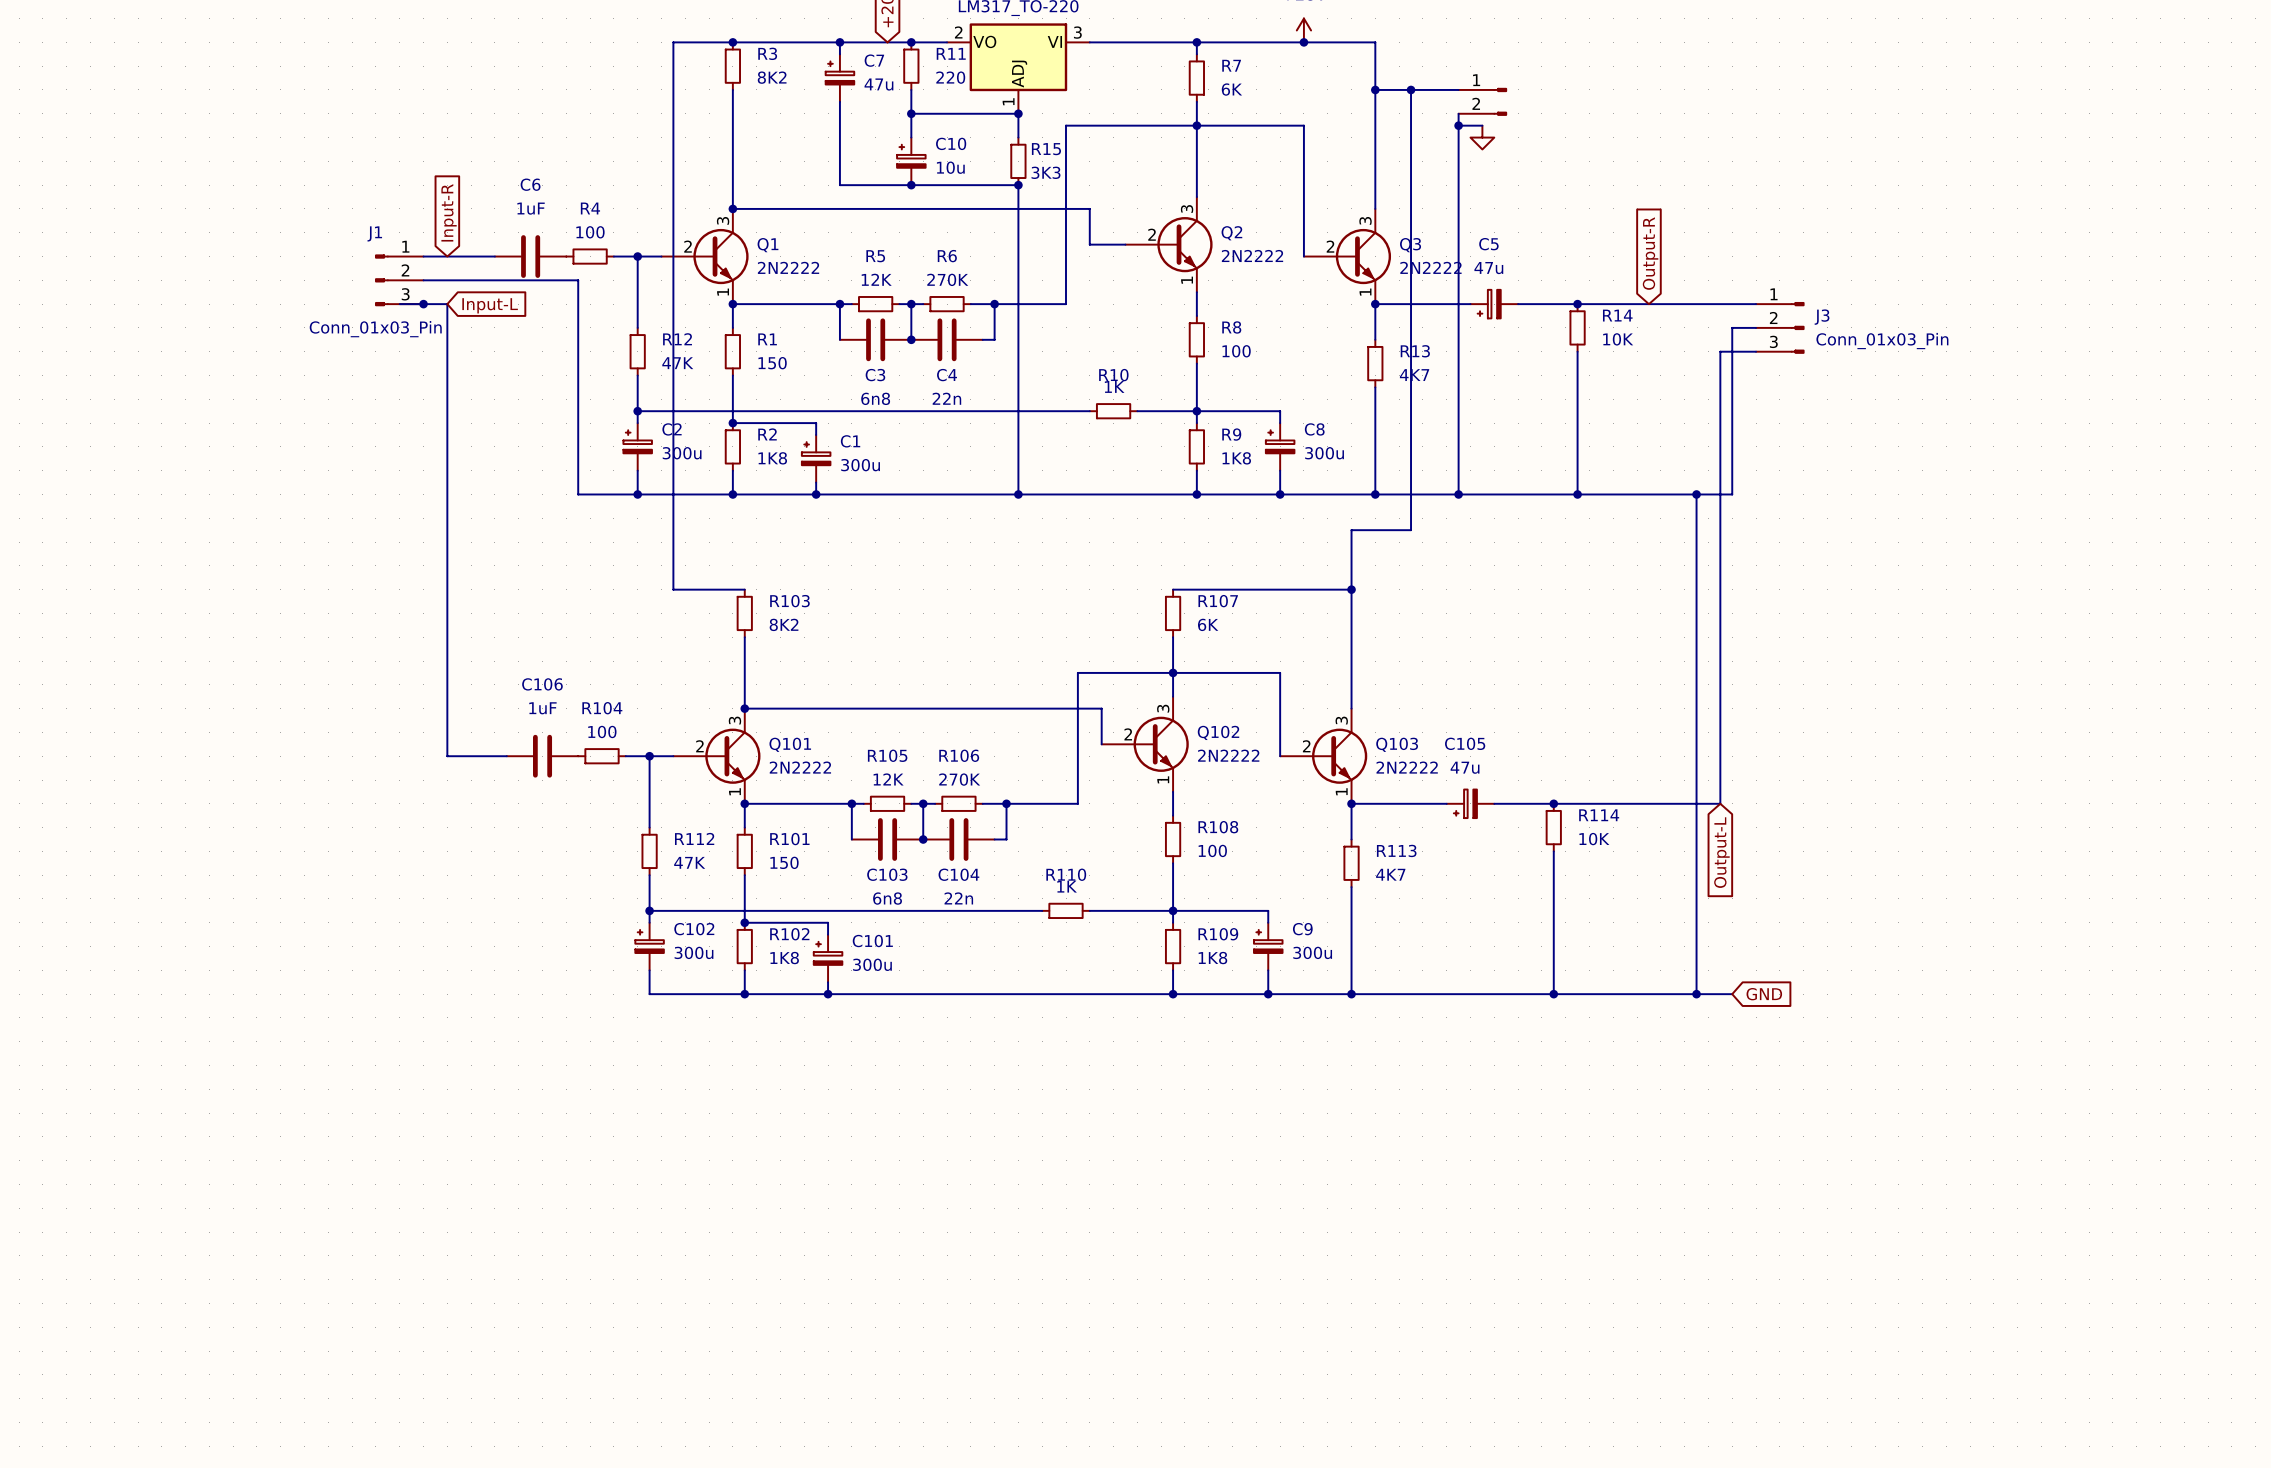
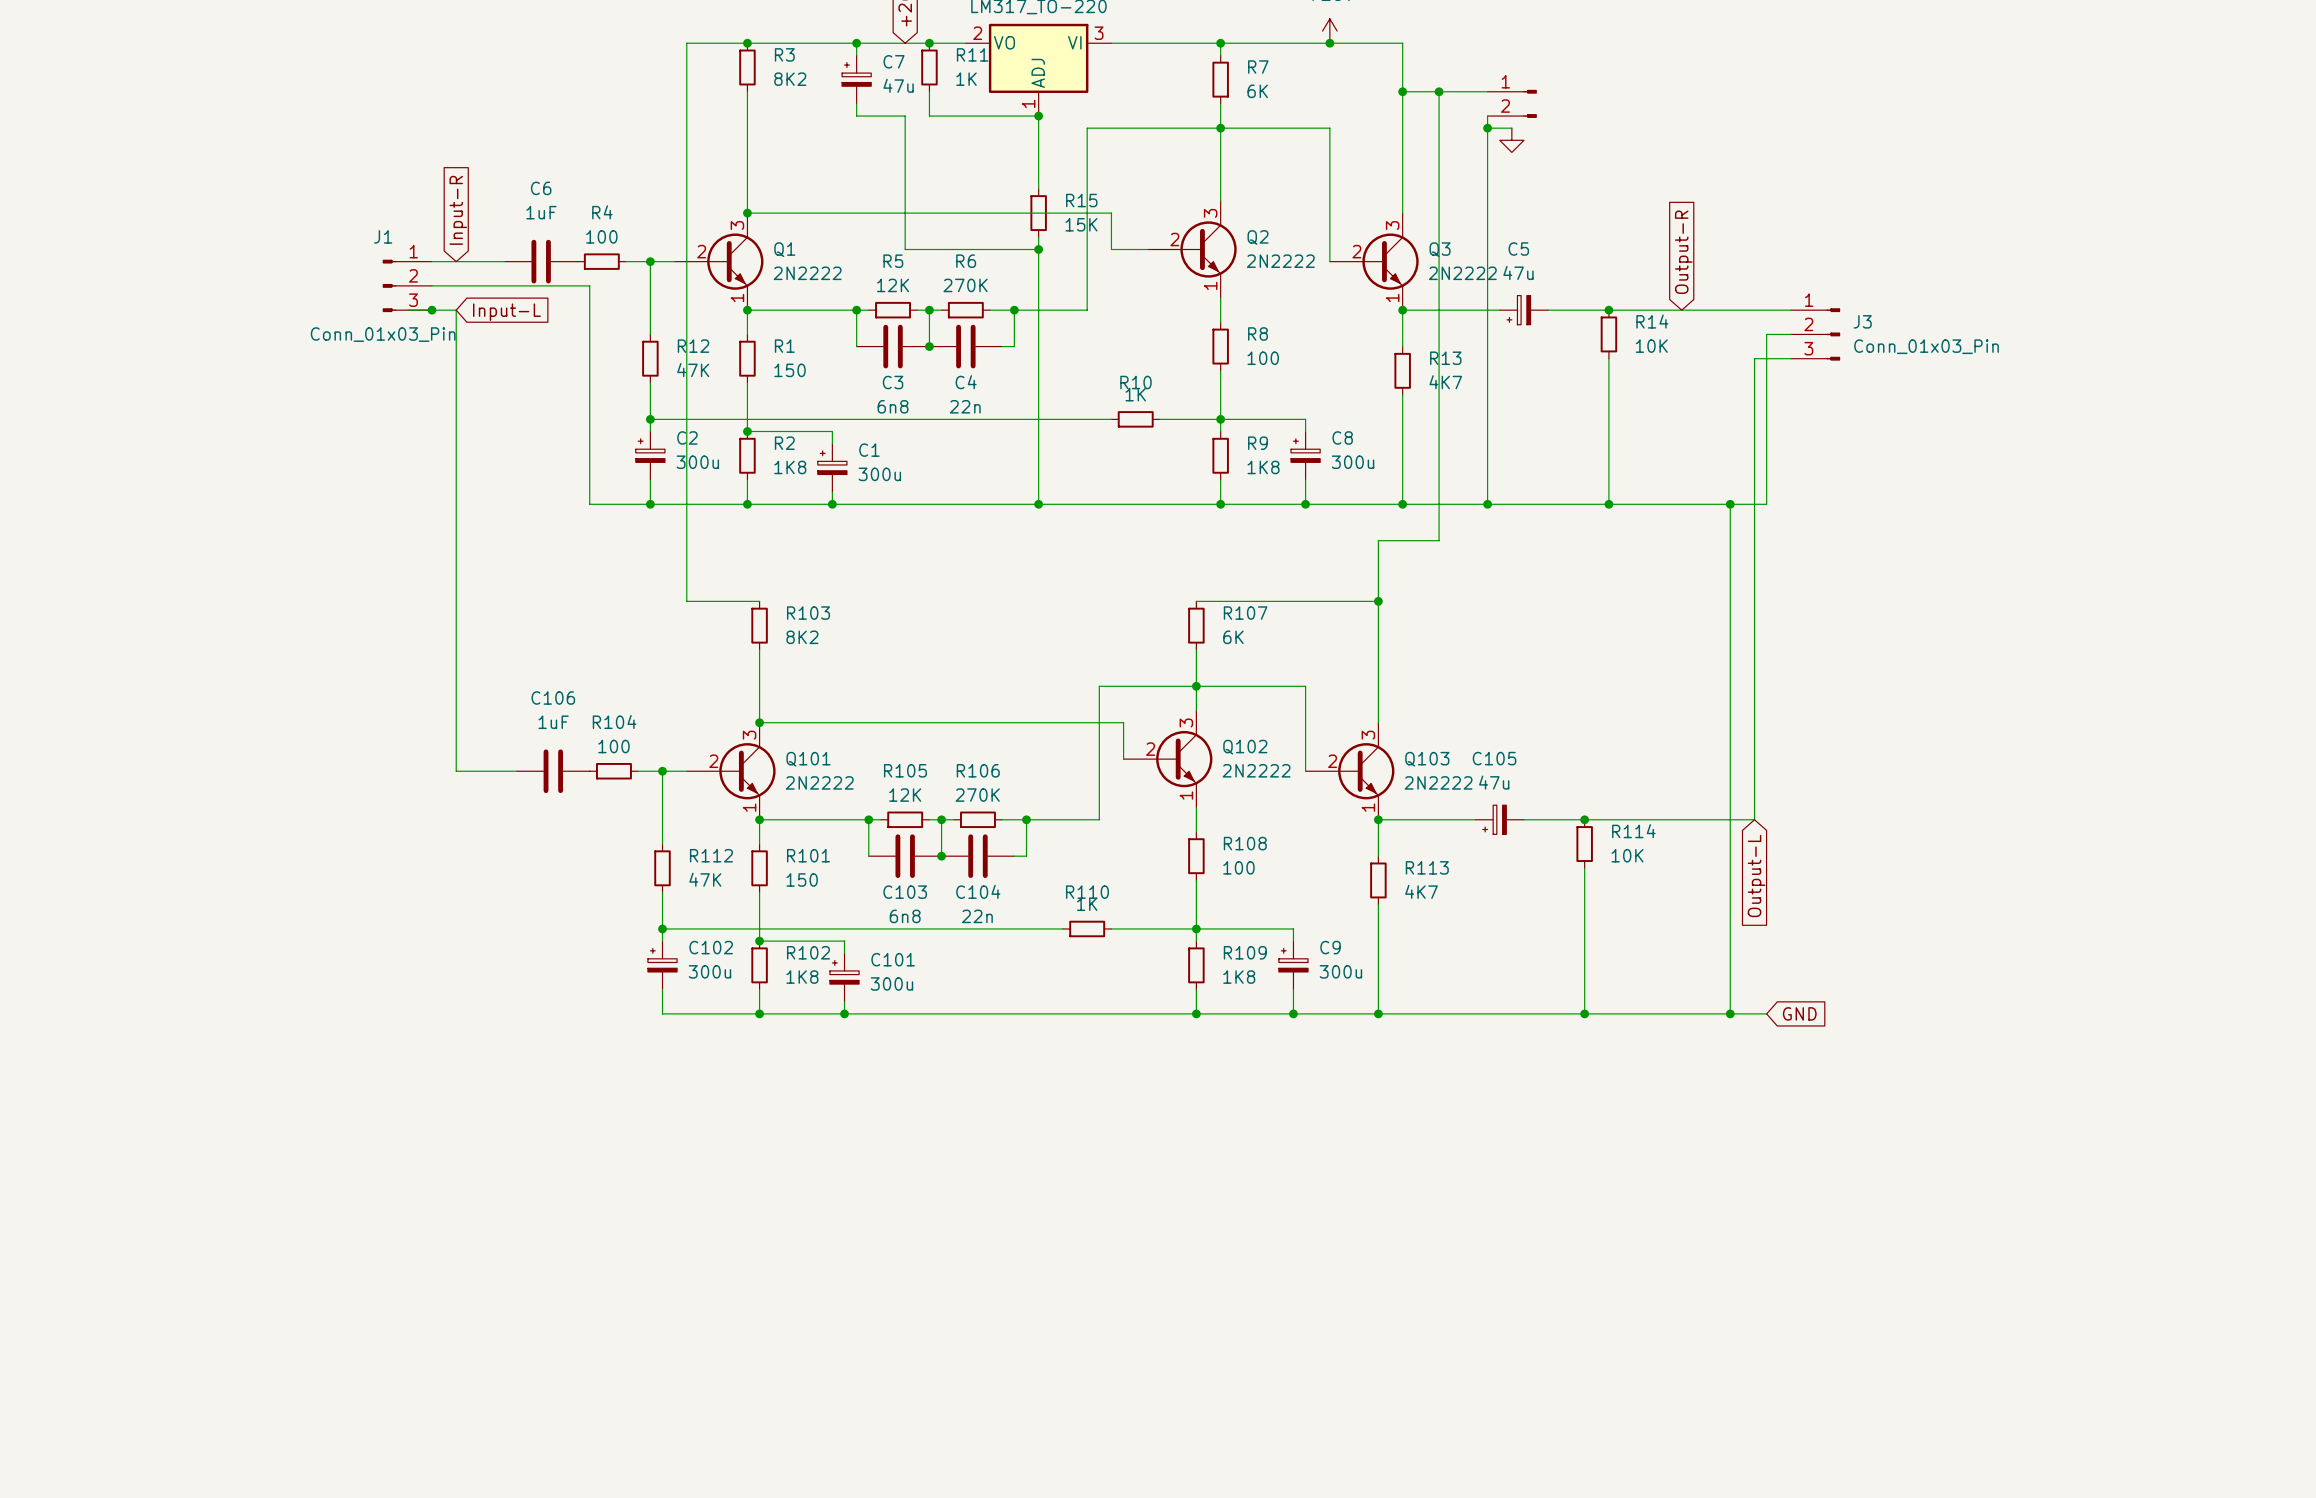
R11 value: 220 (950, 77) -> 1K (966, 79)
wire: (839, 113) (839, 185) (1018, 185) (1018, 232) -> (856, 116) (905, 116) (905, 249) (1038, 249)
wire: (911, 113) (911, 137) -> none
junction: (911, 113) -> none
wire: none -> (1038, 140) (1038, 188)
R15 name position: R15 (1046, 149) -> R15 (1081, 200)
C10: 10u (911, 161) -> none
R15 position: (1018, 161) -> (1038, 213)
R15 value: 3K3 (1046, 172) -> 15K (1081, 224)
junction: (911, 185) -> none
junction: (1018, 185) -> none
junction: none -> (1038, 249)

